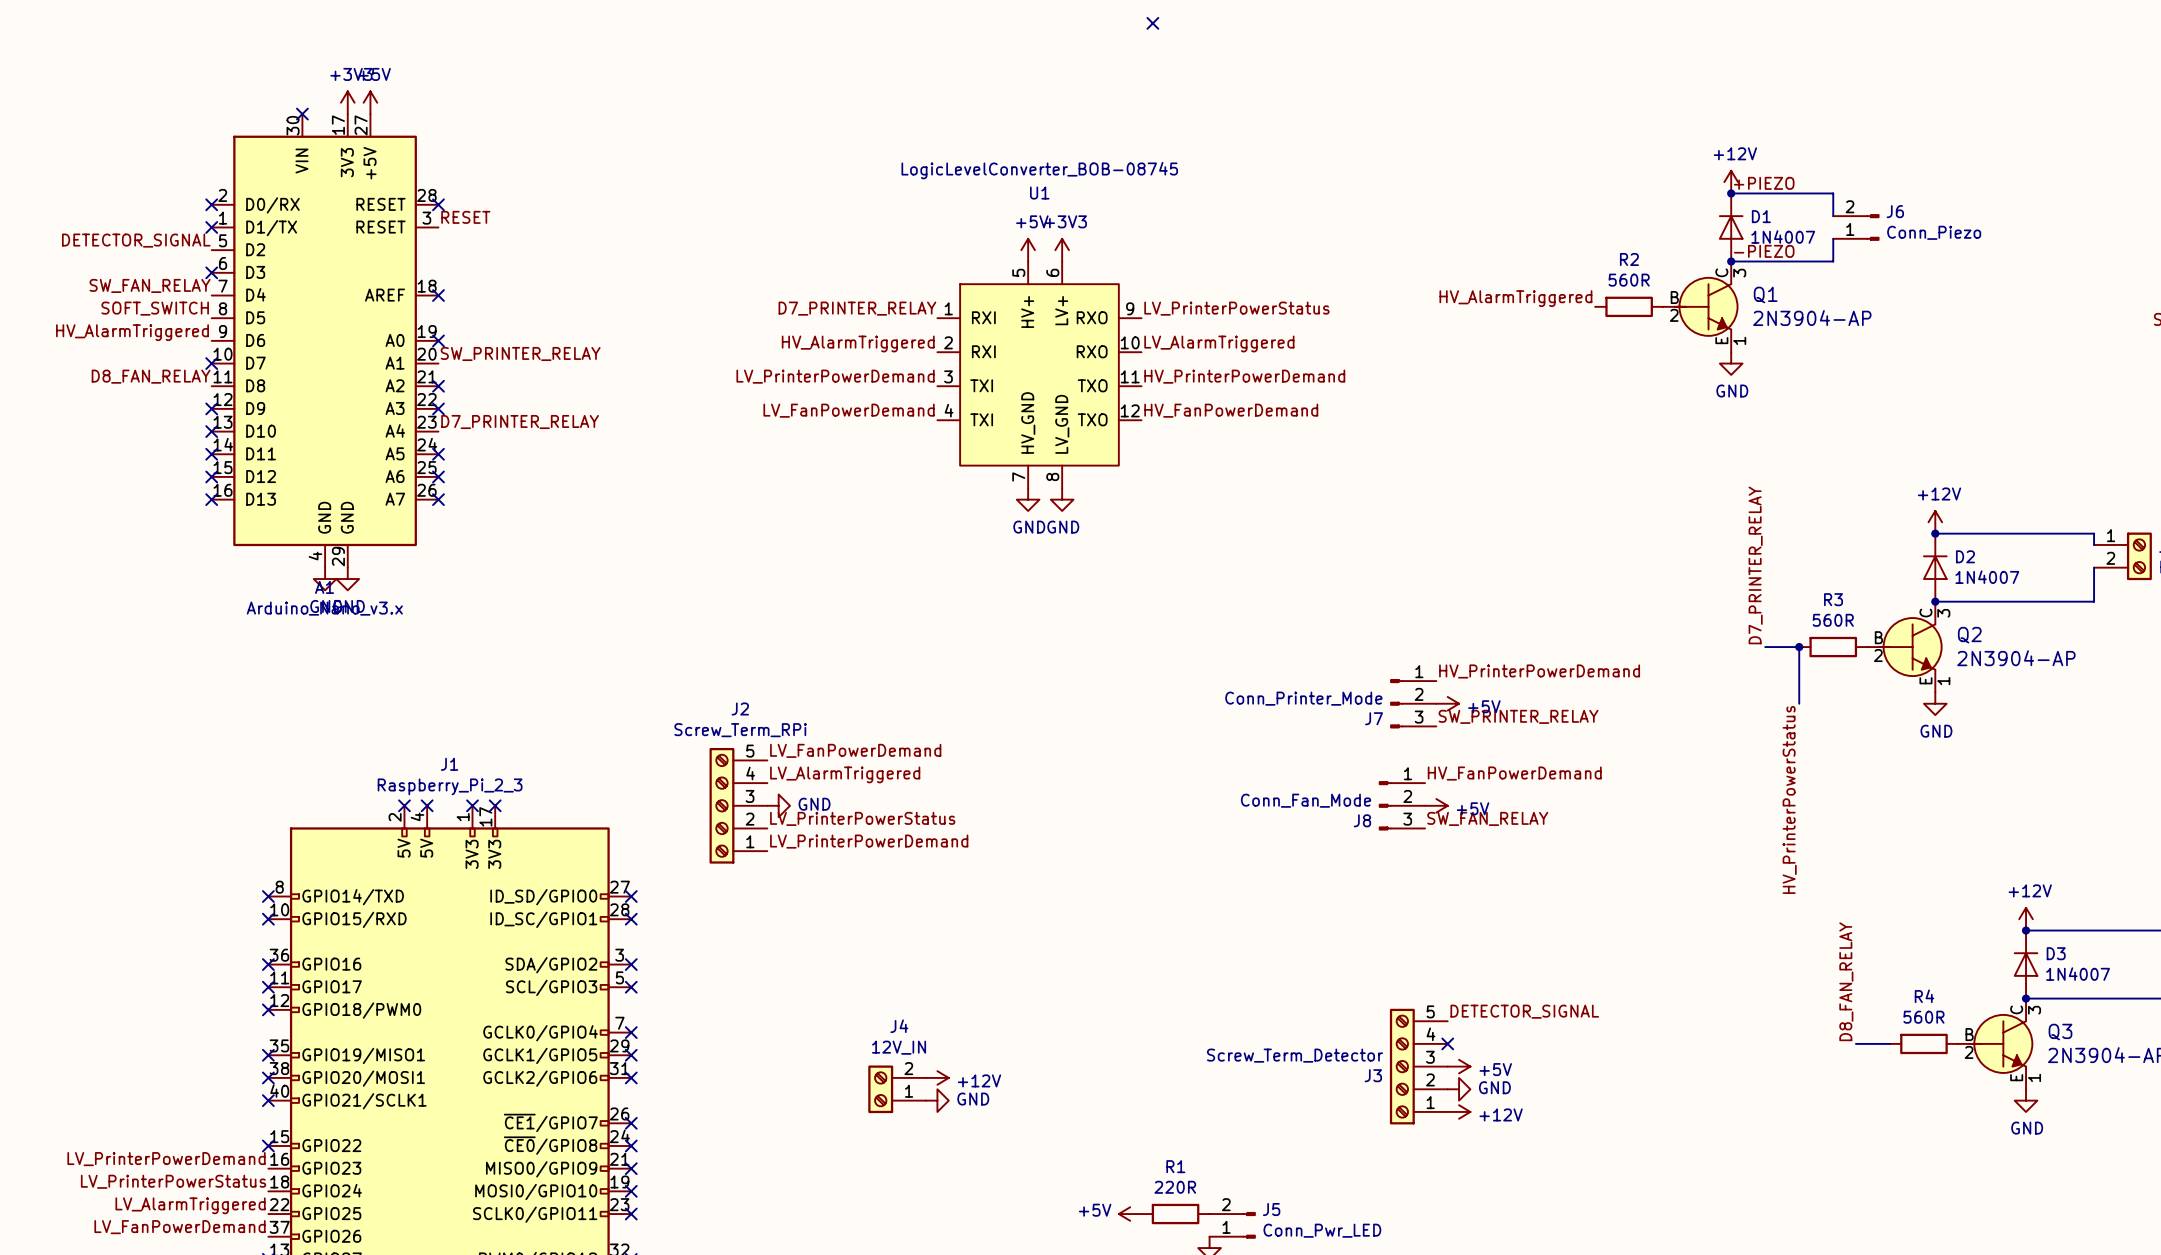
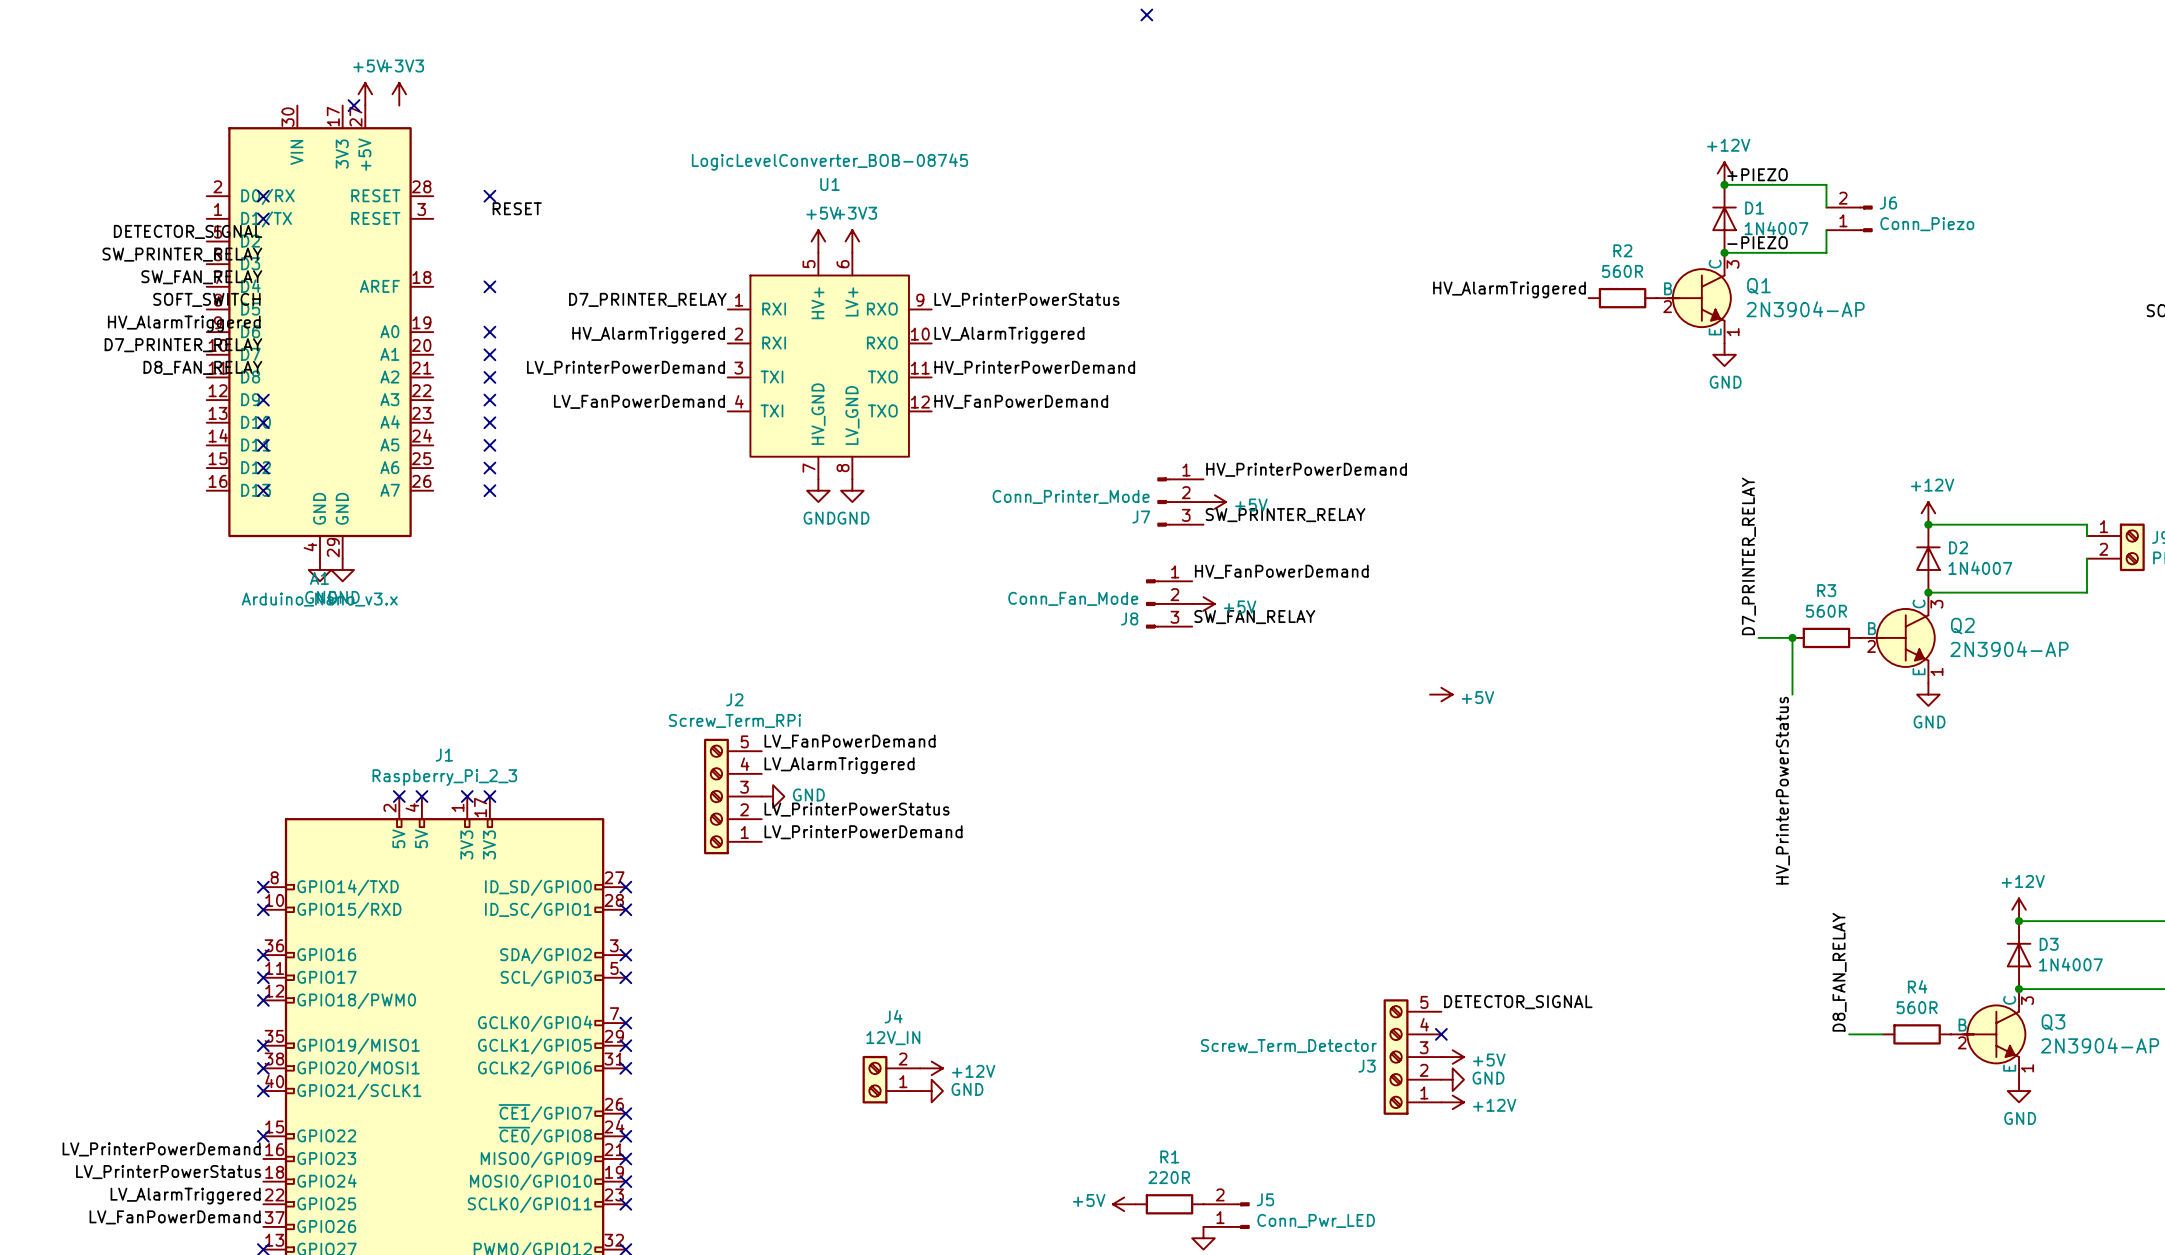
power symbol position: +3V3 (347, 102) -> +3V3 (399, 94)
no-connect mark: (302, 114) -> none
no-connect mark: none -> (353, 105)
no-connect mark: (211, 204) -> none
no-connect mark: none -> (263, 196)
no-connect mark: (438, 204) -> none
no-connect mark: none -> (489, 196)
label position: RESET (465, 217) -> RESET (517, 208)
no-connect mark: (211, 227) -> none
no-connect mark: none -> (263, 218)
label position: DETECTOR_SIGNAL (136, 240) -> DETECTOR_SIGNAL (188, 231)
power symbol: none -> +5V (818, 241)
power symbol: +5V (1028, 250) -> none
power symbol position: +3V3 (1062, 250) -> +3V3 (852, 241)
no-connect mark: (211, 272) -> none
label position: SW_FAN_RELAY (150, 285) -> SW_FAN_RELAY (201, 277)
no-connect mark: (438, 295) -> none
no-connect mark: none -> (489, 286)
label position: SOFT_SWITCH (155, 308) -> SOFT_SWITCH (206, 299)
label: none -> D7_PRINTER_RELAY (647, 299)
label: D7_PRINTER_RELAY (857, 308) -> LV_PrinterPowerStatus (1026, 299)
label: LV_PrinterPowerStatus (1236, 308) -> none
label position: HV_AlarmTriggered (132, 332) -> HV_AlarmTriggered (184, 323)
no-connect mark: (438, 340) -> none
no-connect mark: none -> (489, 332)
label: none -> HV_AlarmTriggered (648, 335)
label: HV_AlarmTriggered (858, 343) -> LV_AlarmTriggered (1009, 335)
label: LV_AlarmTriggered (1219, 343) -> none
label: none -> D7_PRINTER_RELAY (183, 345)
label position: SW_PRINTER_RELAY (520, 353) -> SW_PRINTER_RELAY (182, 254)
no-connect mark: (211, 363) -> none
no-connect mark: none -> (489, 354)
U1 position: (1039, 374) -> (829, 366)
label position: D8_FAN_RELAY (151, 376) -> D8_FAN_RELAY (202, 367)
label: none -> LV_PrinterPowerDemand (626, 367)
label: LV_PrinterPowerDemand (835, 376) -> HV_PrinterPowerDemand (1034, 367)
label position: HV_PrinterPowerDemand (1244, 376) -> HV_PrinterPowerDemand (1306, 469)
no-connect mark: (438, 386) -> none
no-connect mark: none -> (489, 377)
no-connect mark: (211, 408) -> none
no-connect mark: none -> (263, 400)
no-connect mark: (438, 408) -> none
no-connect mark: none -> (489, 400)
label: none -> LV_FanPowerDemand (639, 401)
label: LV_FanPowerDemand (849, 410) -> HV_FanPowerDemand (1021, 401)
label: HV_FanPowerDemand (1231, 410) -> none
label: D7_PRINTER_RELAY (520, 422) -> none
no-connect mark: (211, 431) -> none
no-connect mark: none -> (263, 422)
no-connect mark: none -> (489, 422)
no-connect mark: (211, 454) -> none
no-connect mark: none -> (263, 445)
no-connect mark: (438, 454) -> none
no-connect mark: none -> (489, 445)
no-connect mark: (211, 476) -> none
no-connect mark: none -> (263, 468)
no-connect mark: (438, 476) -> none
no-connect mark: none -> (489, 468)
no-connect mark: (211, 499) -> none
no-connect mark: none -> (263, 490)
no-connect mark: (438, 499) -> none
no-connect mark: none -> (489, 490)
power symbol: none -> GND (818, 490)
power symbol: none -> GND (852, 490)
power symbol: GND (1028, 499) -> none
power symbol: GND (1062, 499) -> none
power symbol: none -> +5V (1214, 502)
label: none -> SW_PRINTER_RELAY (1285, 515)
label: none -> HV_FanPowerDemand (1281, 571)
power symbol: none -> +5V (1203, 603)
label: none -> SW_FAN_RELAY (1254, 617)
label: HV_PrinterPowerDemand (1539, 671) -> none
J7 position: (1413, 703) -> (1180, 502)
label: SW_PRINTER_RELAY (1518, 716) -> none
label: HV_FanPowerDemand (1514, 773) -> none
J8 position: (1402, 805) -> (1169, 603)
power symbol: +5V (1436, 805) -> none
label: SW_FAN_RELAY (1487, 818) -> none

